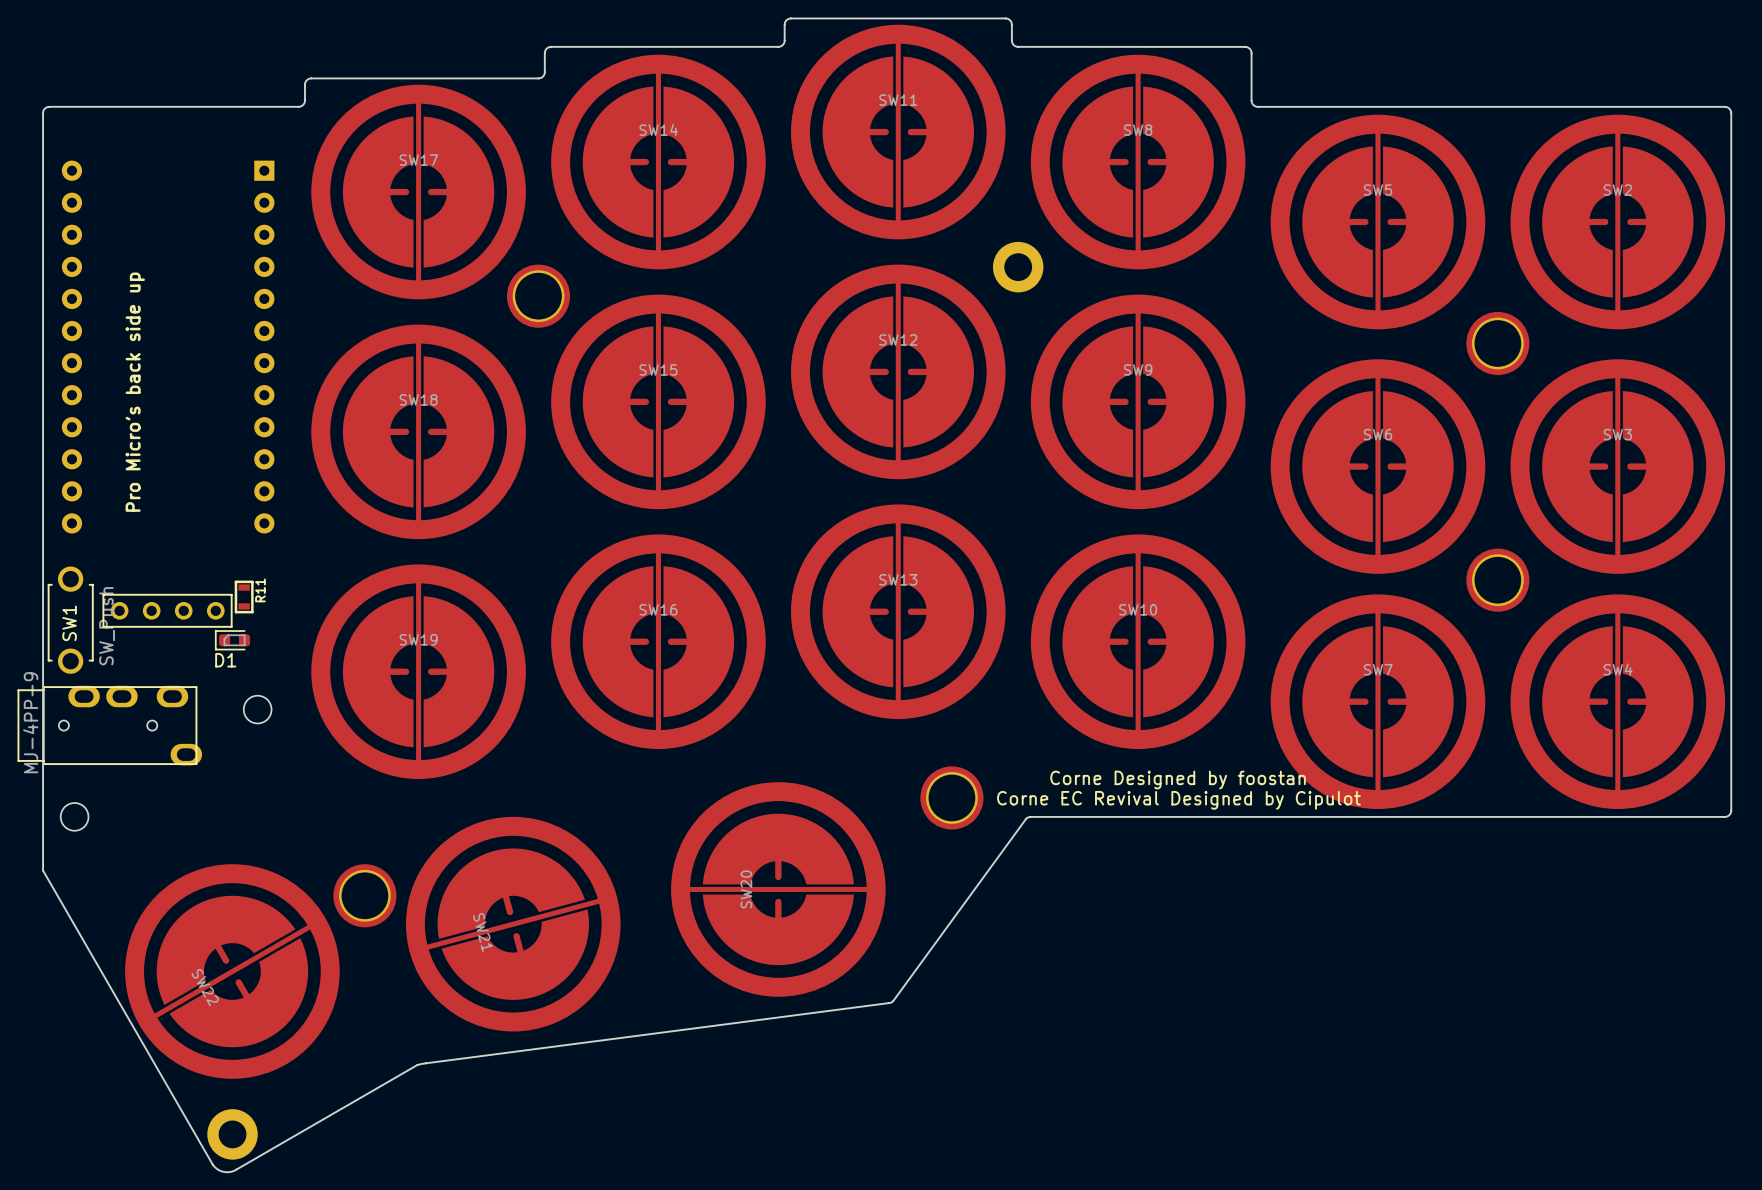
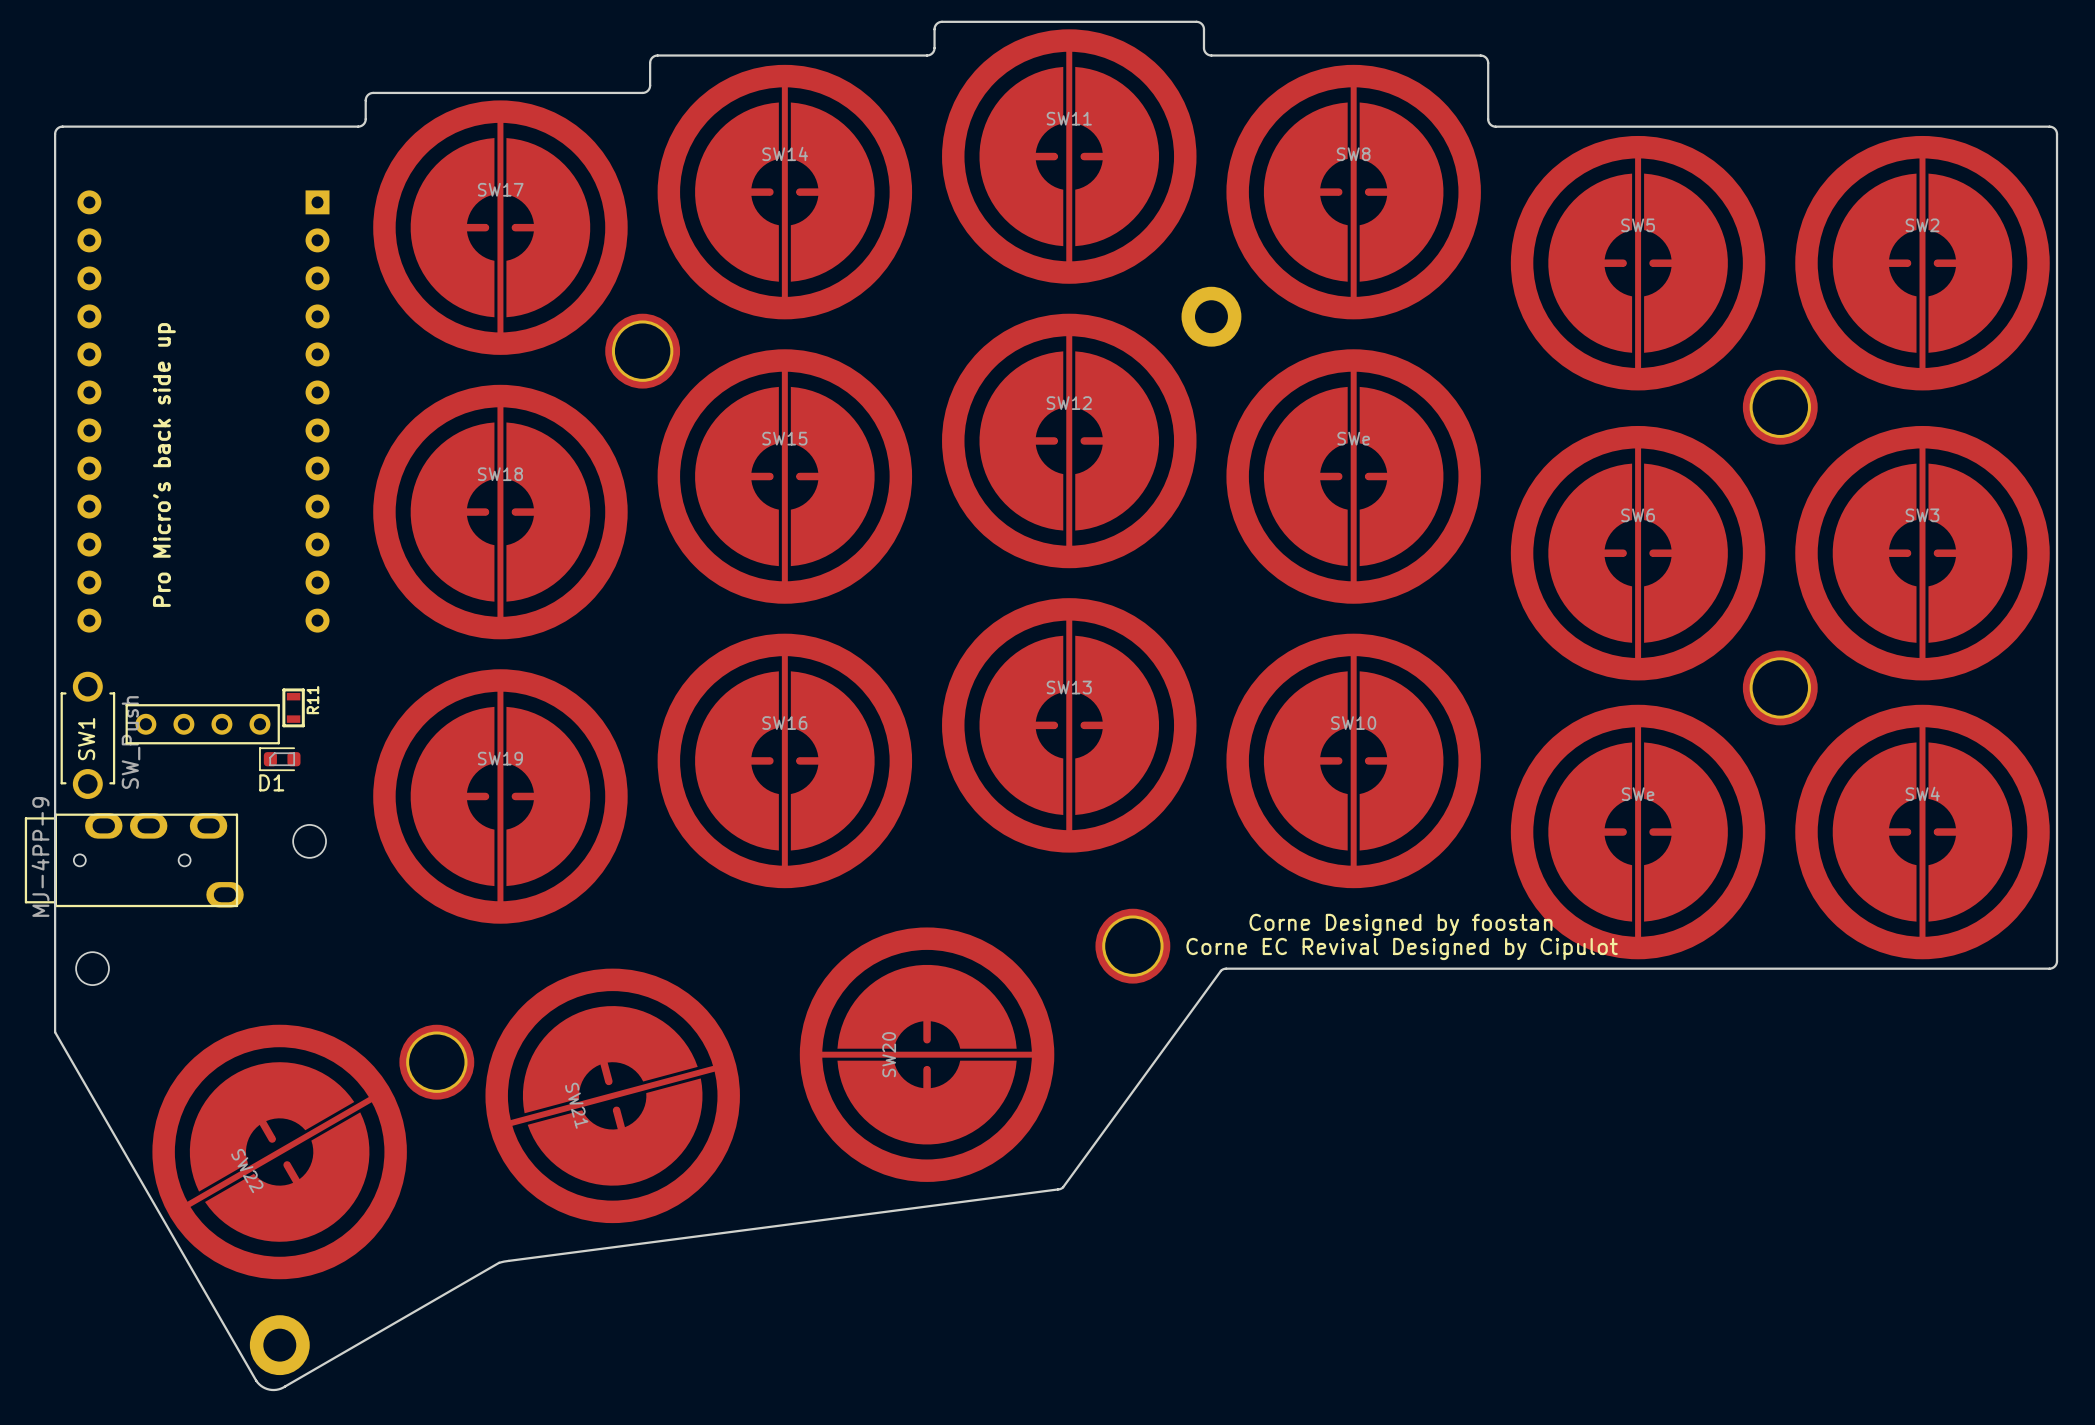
SW9 name: SW9 (1138, 369) -> SWe (1353, 438)
SW7 name: SW7 (1378, 669) -> SWe (1638, 794)

